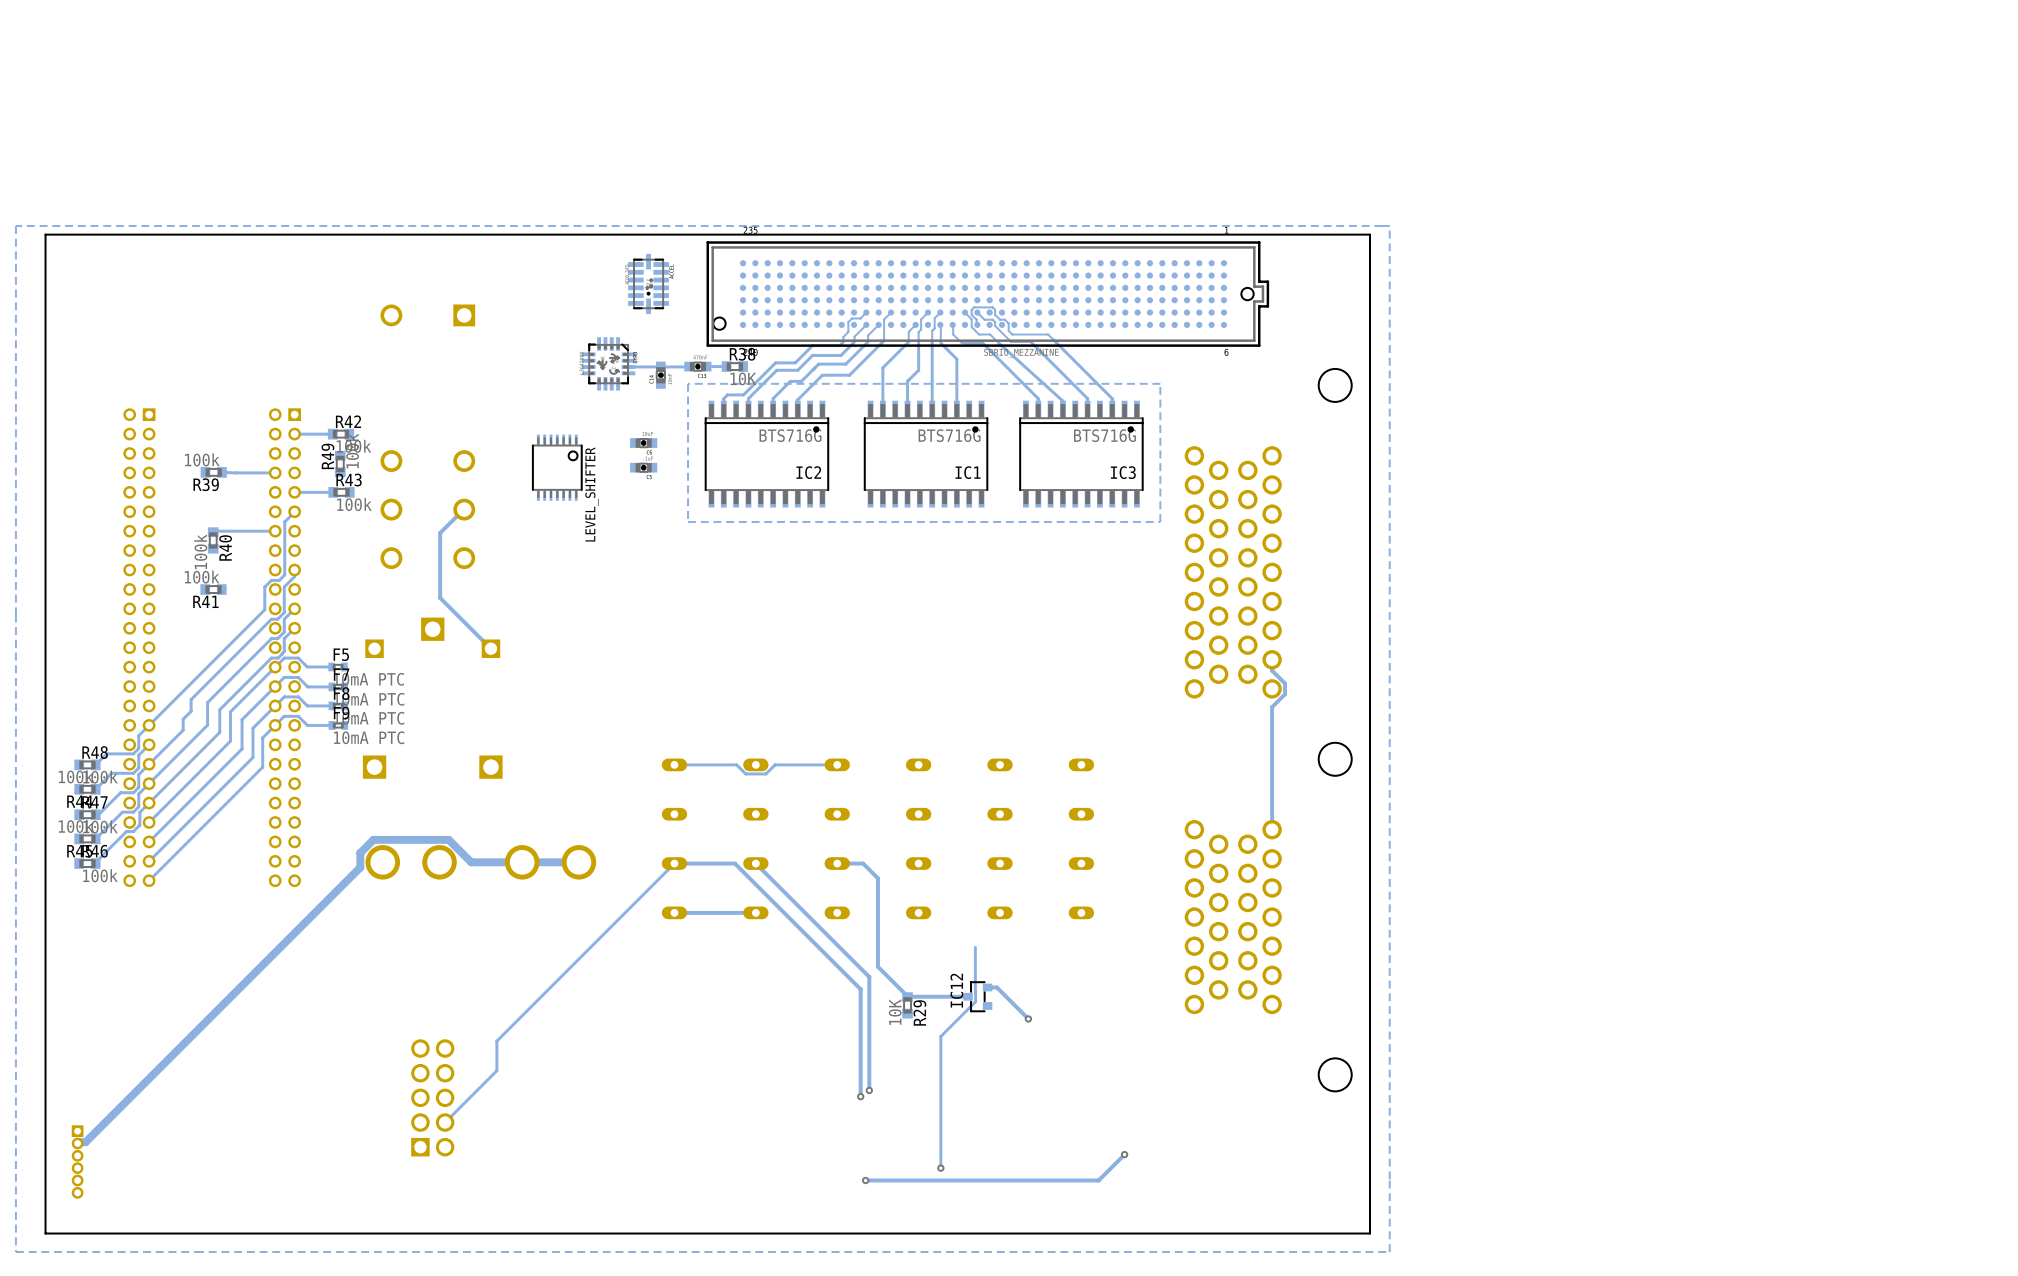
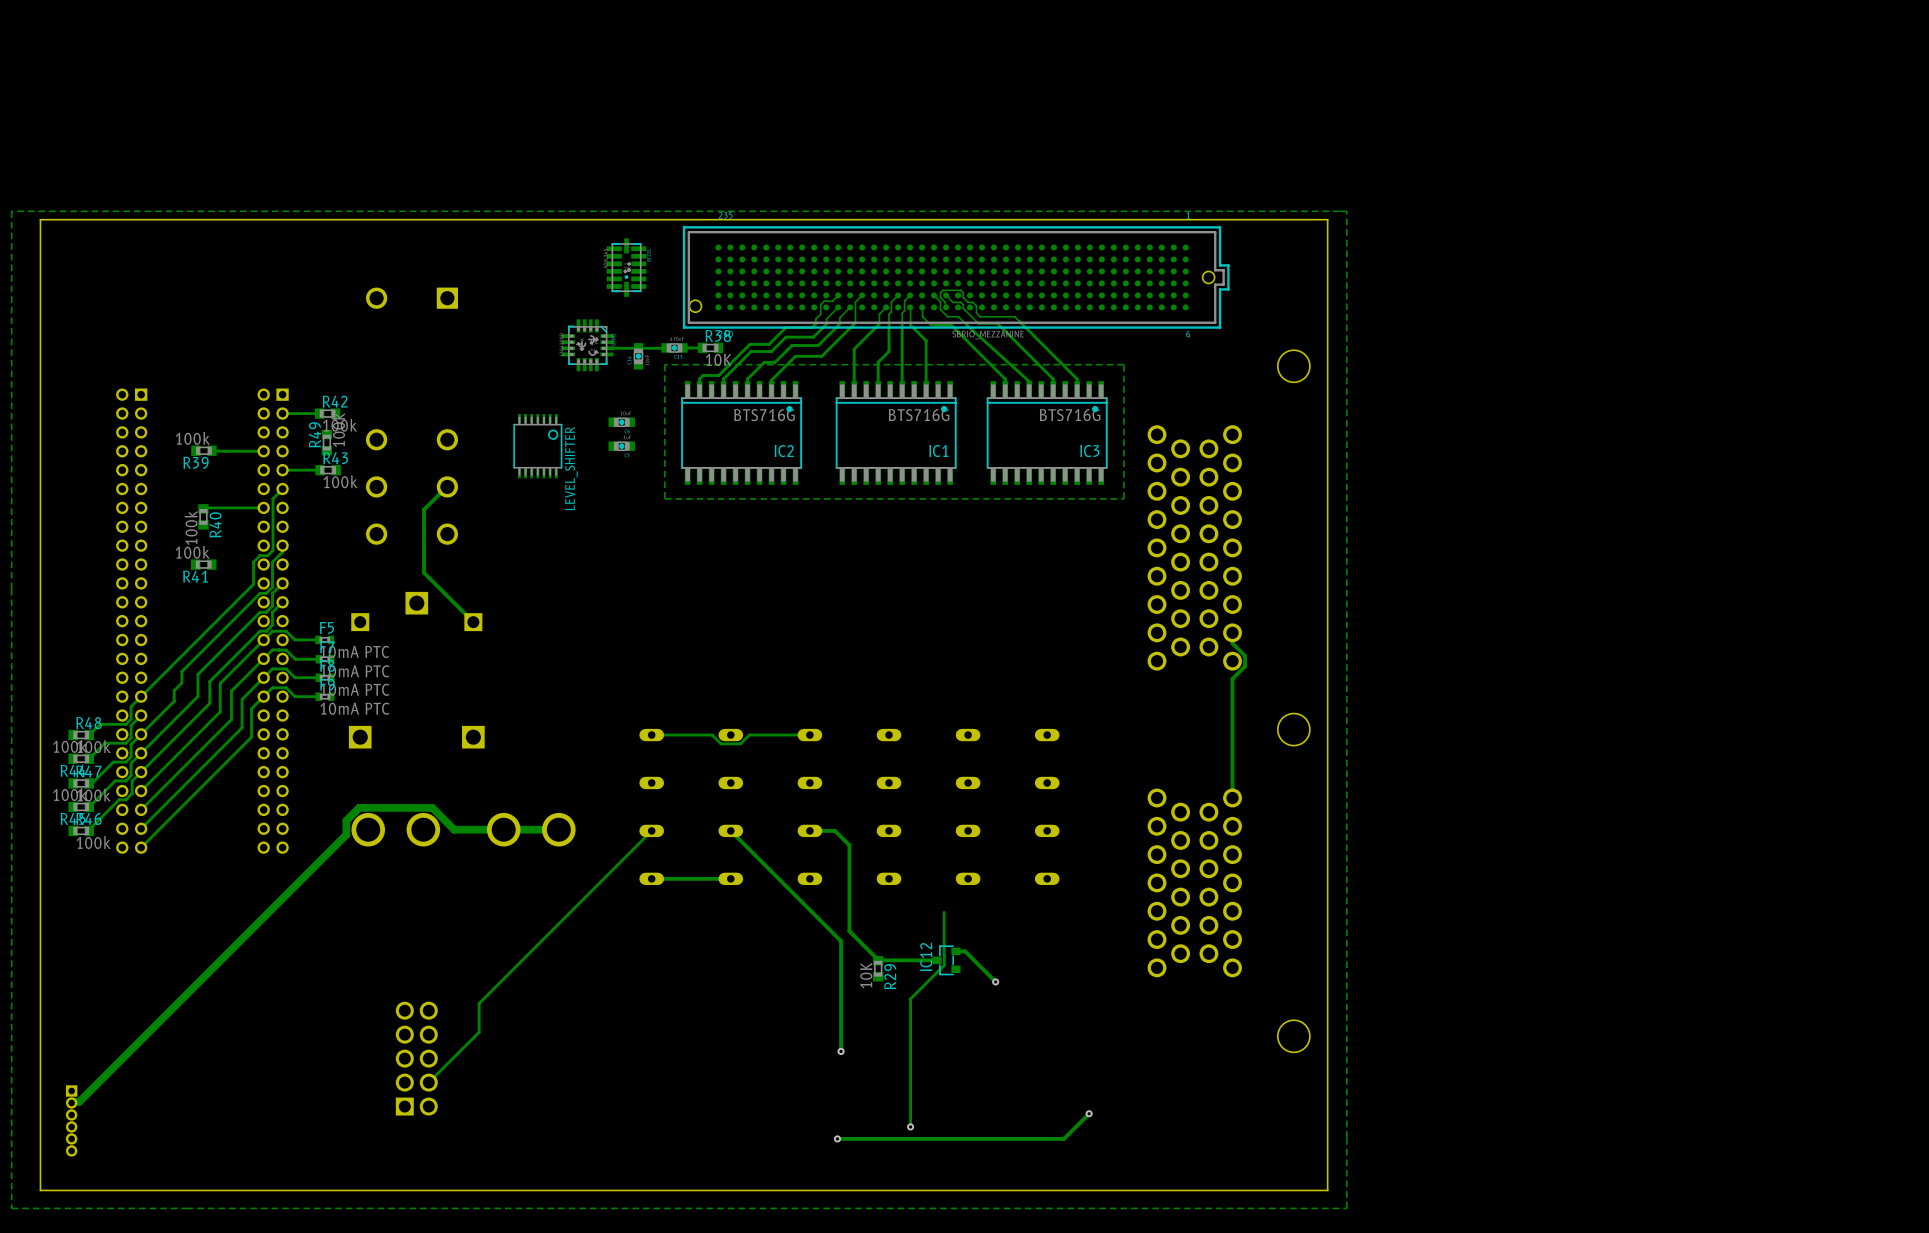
track: (674, 863) (734, 863) (860, 989) (860, 1096) -> none
via: (860, 1096) -> none

